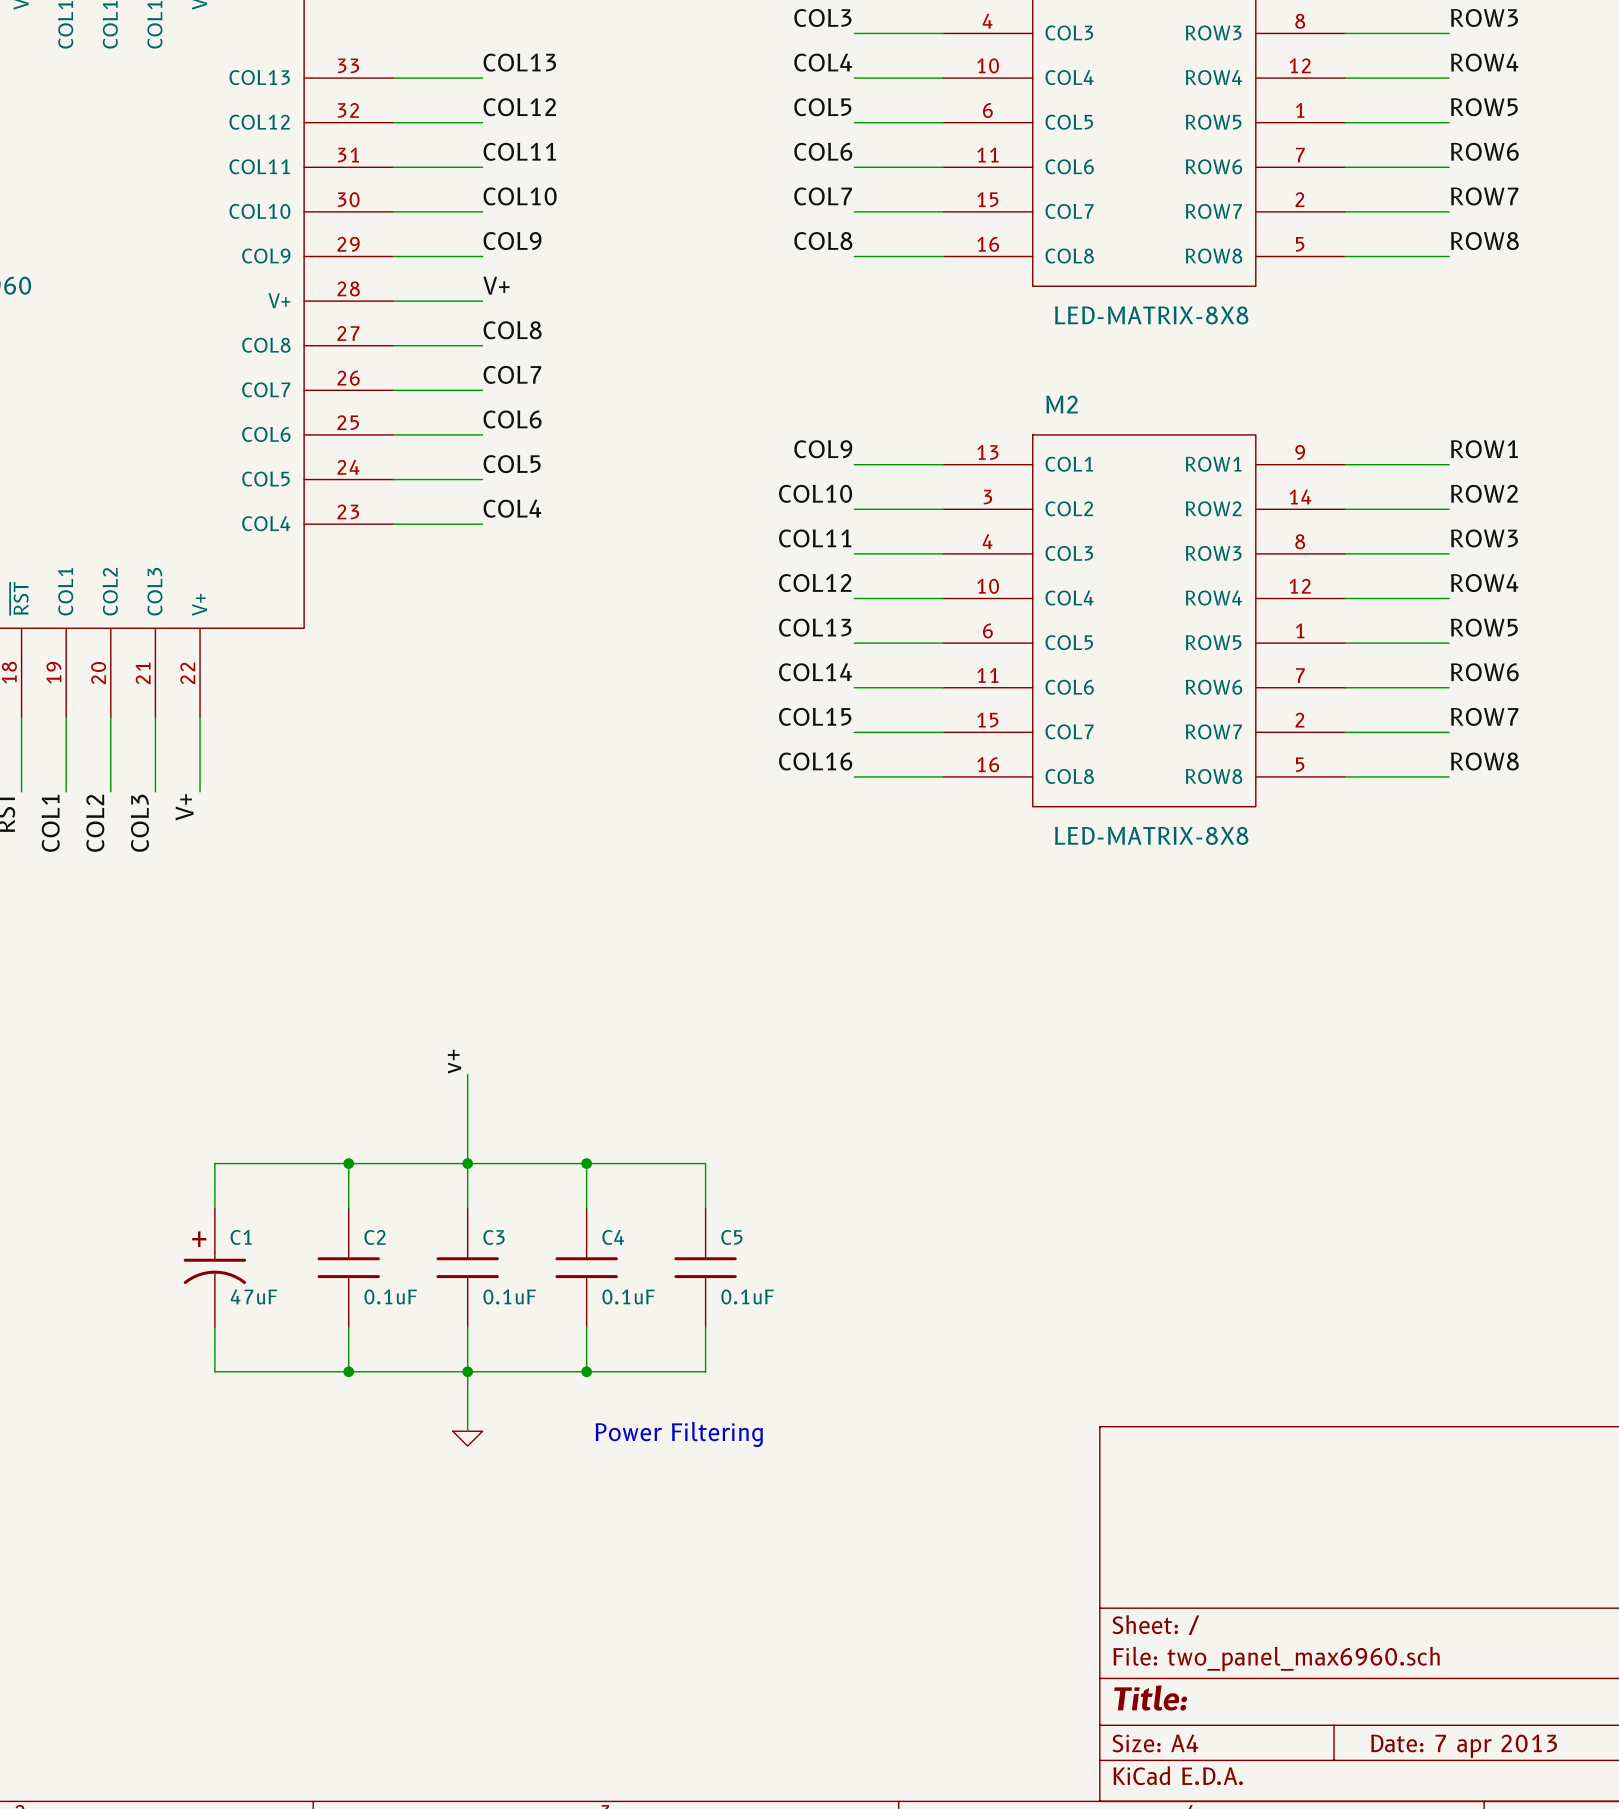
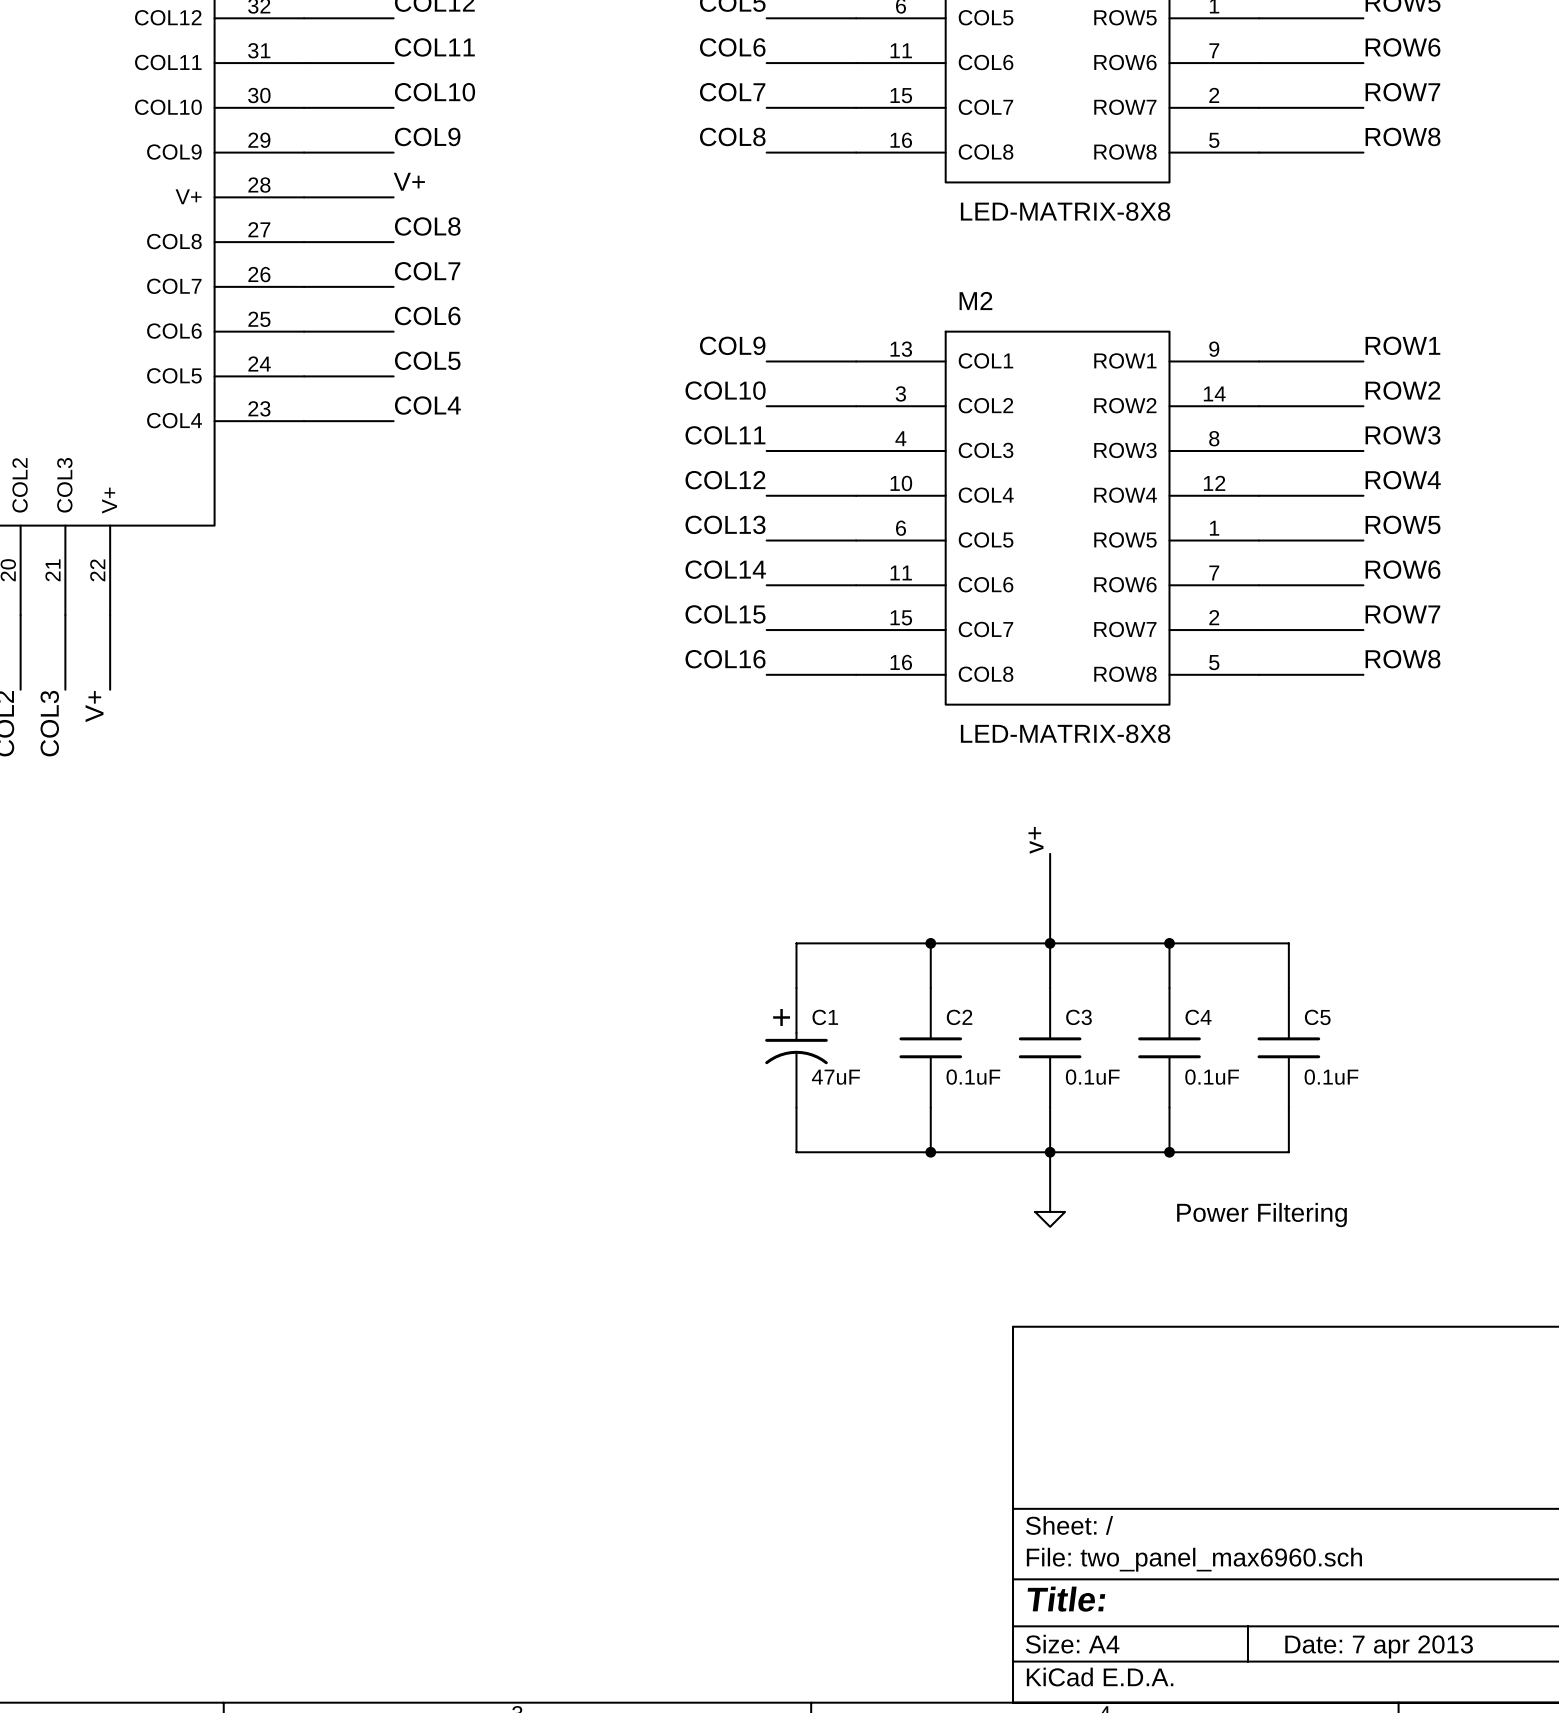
label: none -> v+ (1035, 840)
wire: none -> (1050, 853) (1050, 988)
wire: none -> (930, 943) (930, 988)
junction: none -> (930, 943)
junction: none -> (1050, 943)
wire: none -> (1169, 943) (1169, 988)
junction: none -> (1169, 943)
label: v+ (454, 1061) -> none
wire: (467, 1074) (467, 1208) -> none
wire: none -> (796, 988) (796, 943) (1288, 943) (1288, 988)
wire: (348, 1163) (348, 1208) -> none
junction: (348, 1163) -> none
junction: (467, 1163) -> none
wire: (586, 1163) (586, 1208) -> none
junction: (586, 1163) -> none
wire: (214, 1208) (214, 1163) (705, 1163) (705, 1208) -> none
wire: none -> (796, 1107) (796, 1152) (1288, 1152) (1288, 1107)
wire: none -> (930, 1107) (930, 1152)
wire: none -> (1050, 1107) (1050, 1211)
wire: none -> (1169, 1107) (1169, 1152)
junction: none -> (930, 1152)
junction: none -> (1050, 1152)
junction: none -> (1169, 1152)
C1 position: (214, 1267) -> (796, 1047)
C2 position: (348, 1267) -> (930, 1047)
C3 position: (467, 1267) -> (1050, 1047)
C4 position: (586, 1267) -> (1169, 1047)
C5 position: (705, 1267) -> (1288, 1047)
text: none -> Power Filtering (1261, 1215)
power symbol: none -> (1050, 1219)
wire: (214, 1327) (214, 1371) (705, 1371) (705, 1327) -> none
wire: (348, 1327) (348, 1371) -> none
wire: (467, 1327) (467, 1431) -> none
wire: (586, 1327) (586, 1371) -> none
junction: (348, 1371) -> none
junction: (467, 1371) -> none
junction: (586, 1371) -> none
text: Power Filtering (679, 1434) -> none
power symbol: (467, 1438) -> none

